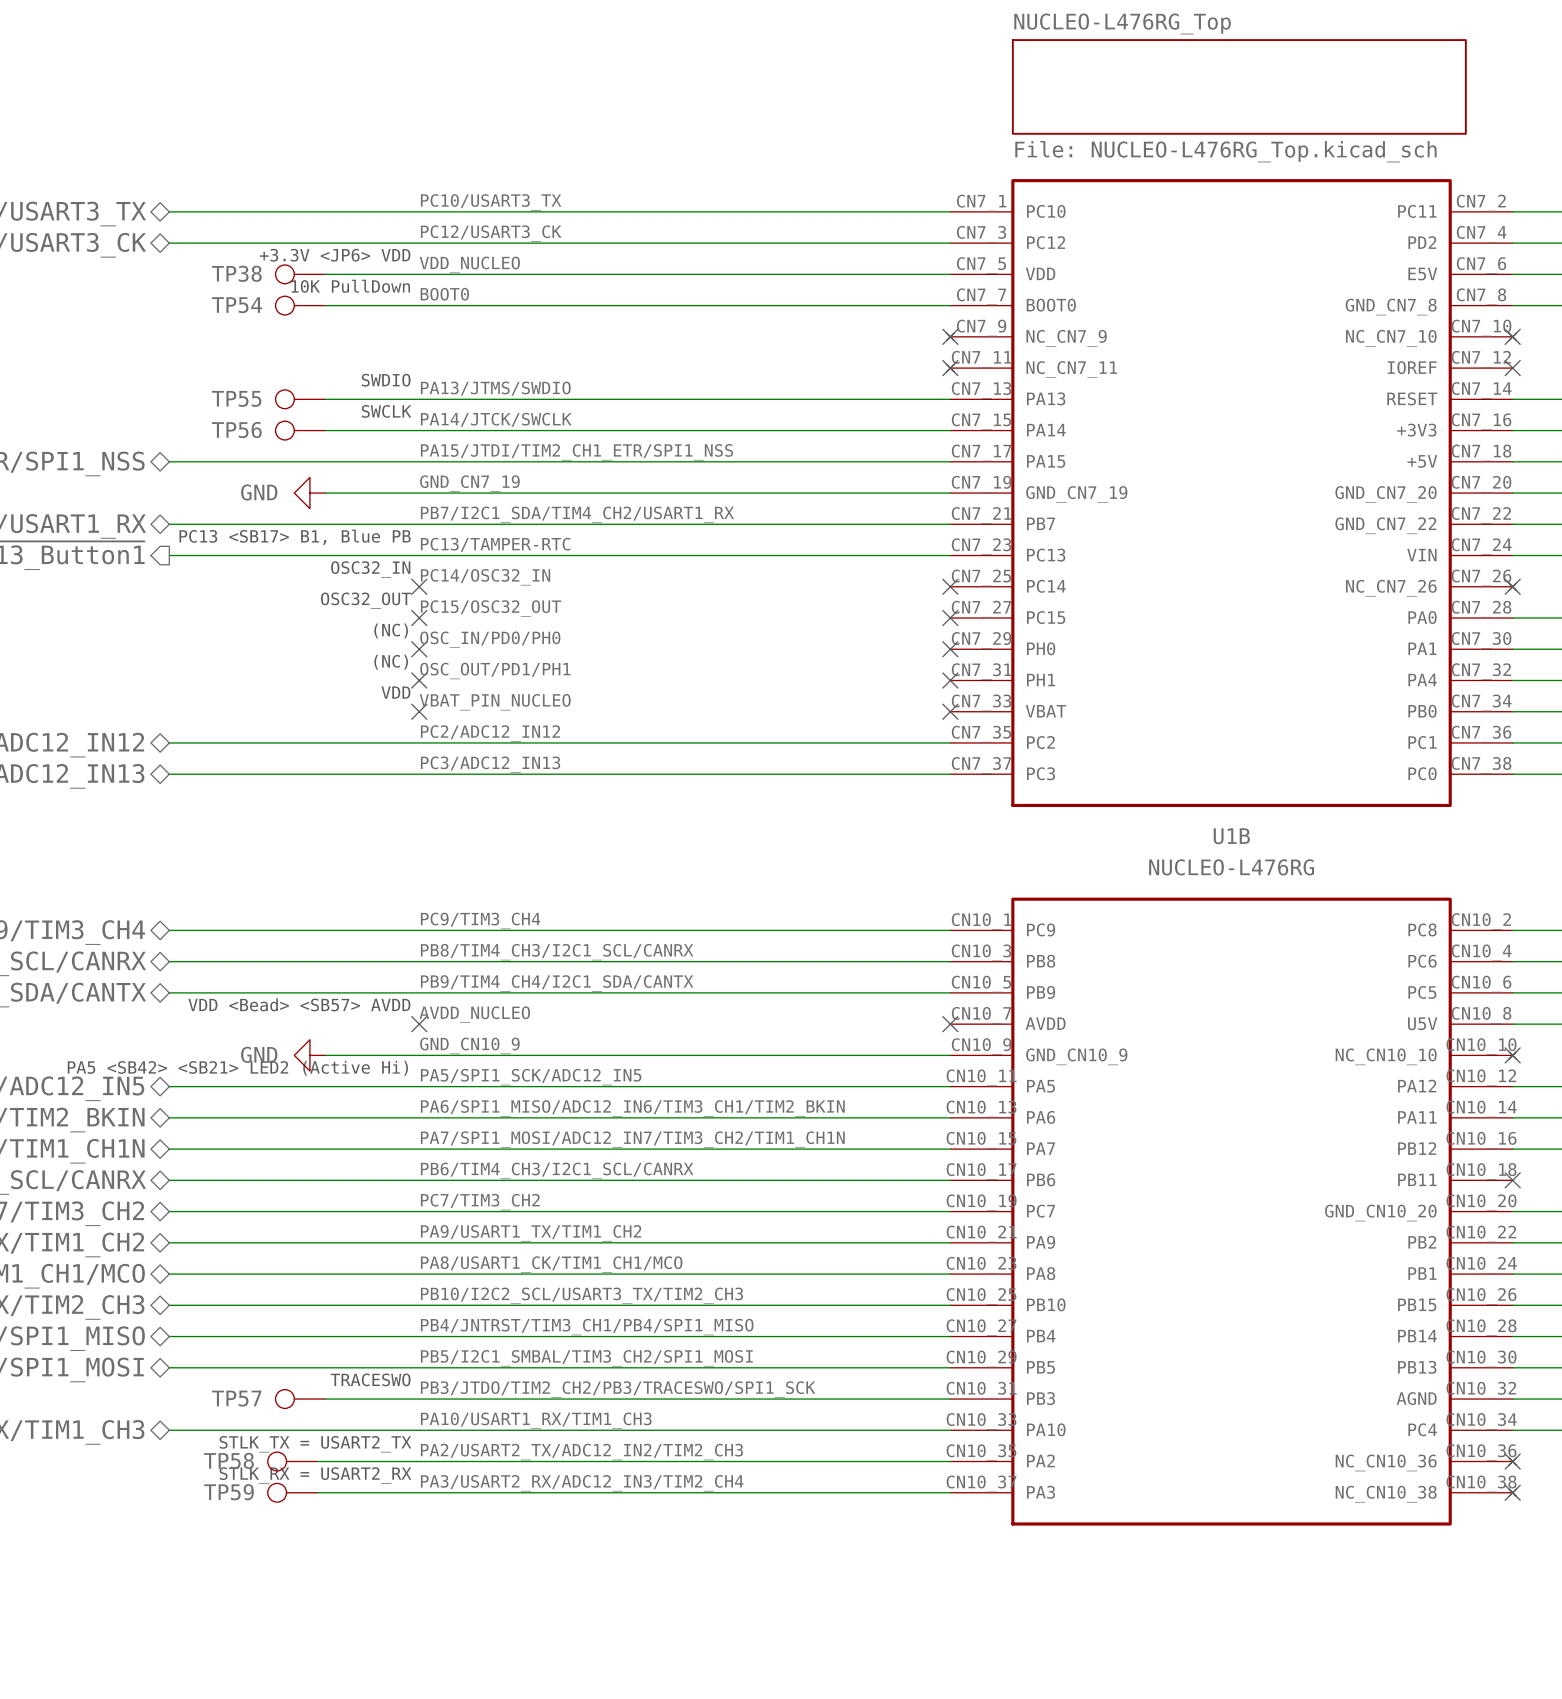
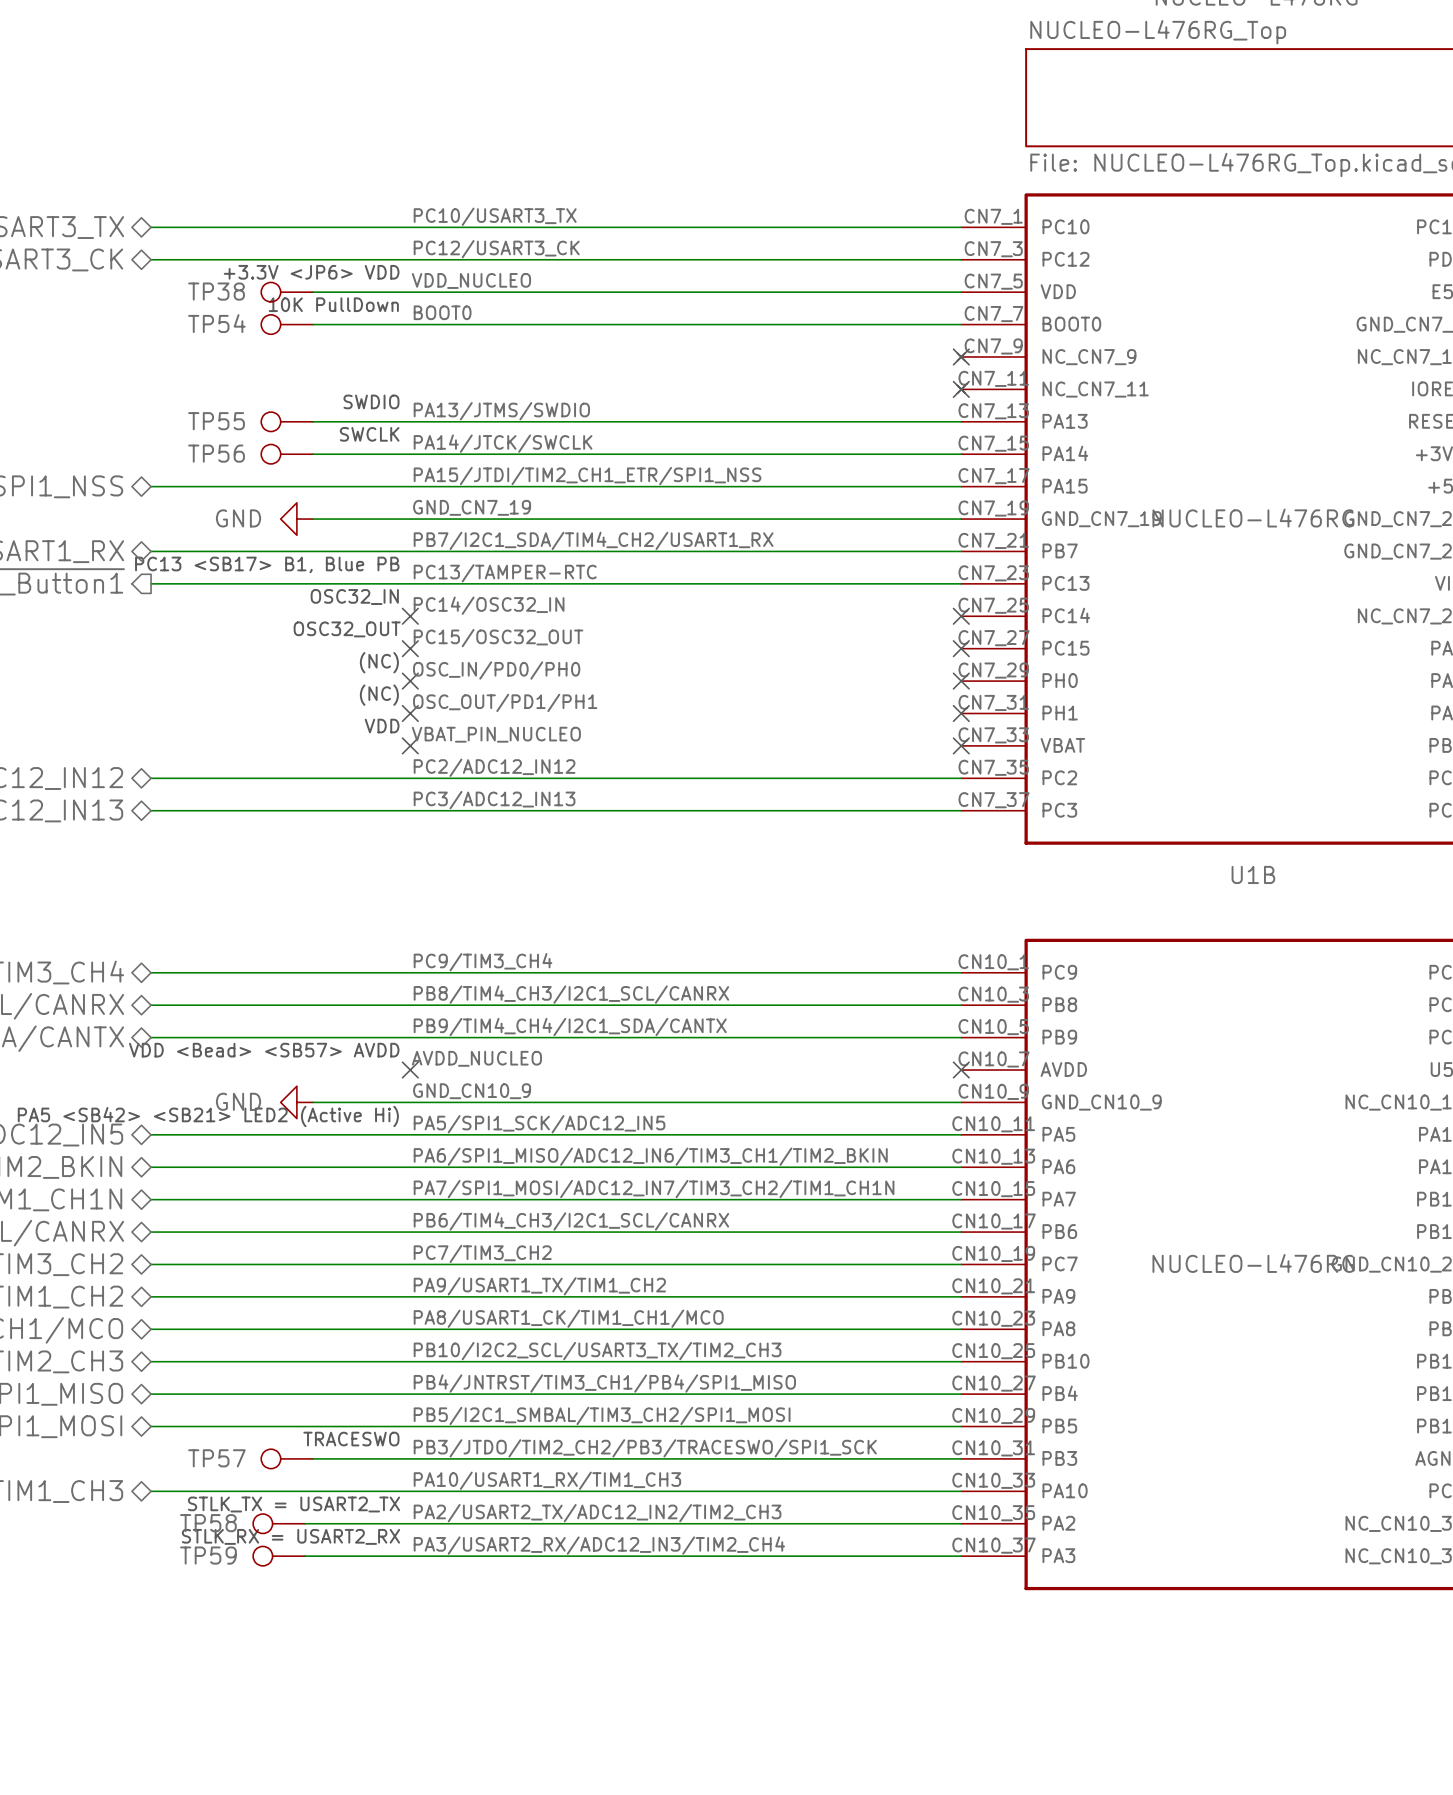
part text: none -> NUCLEO-L476RG (1253, 518)
U1B value: NUCLEO-L476RG (1231, 867) -> none
U1B text: none -> NUCLEO-L476RG (1253, 1263)

